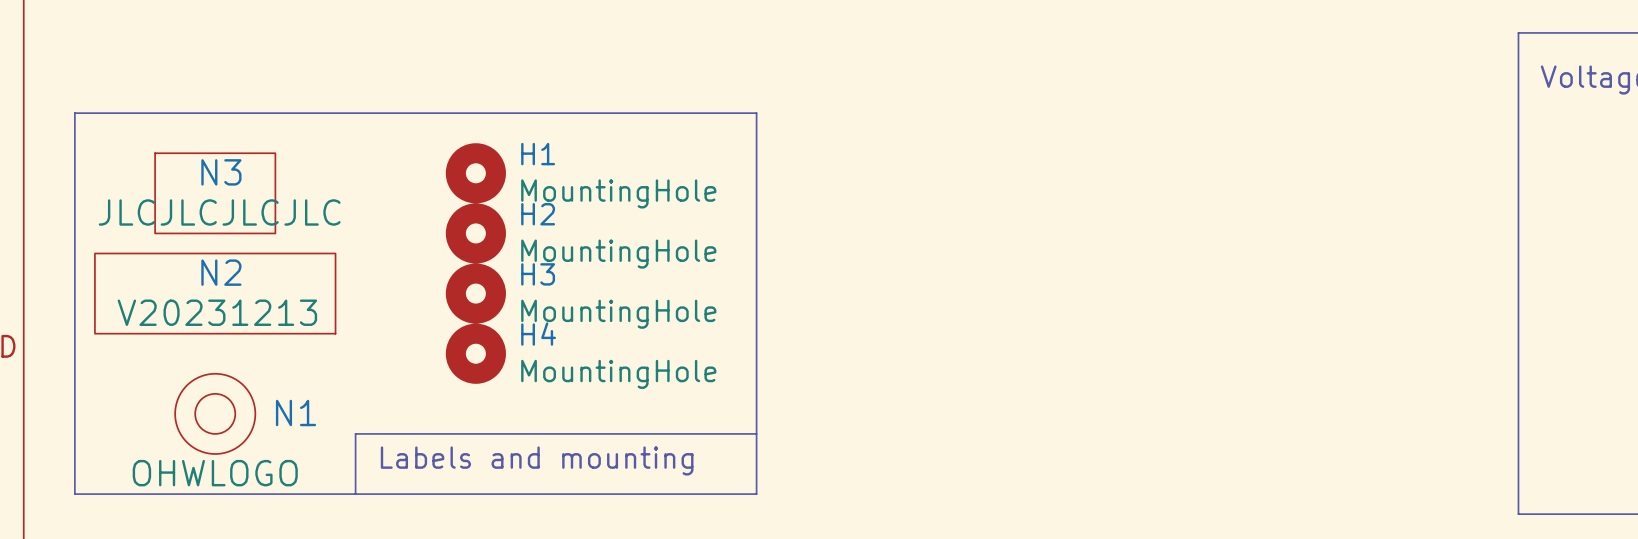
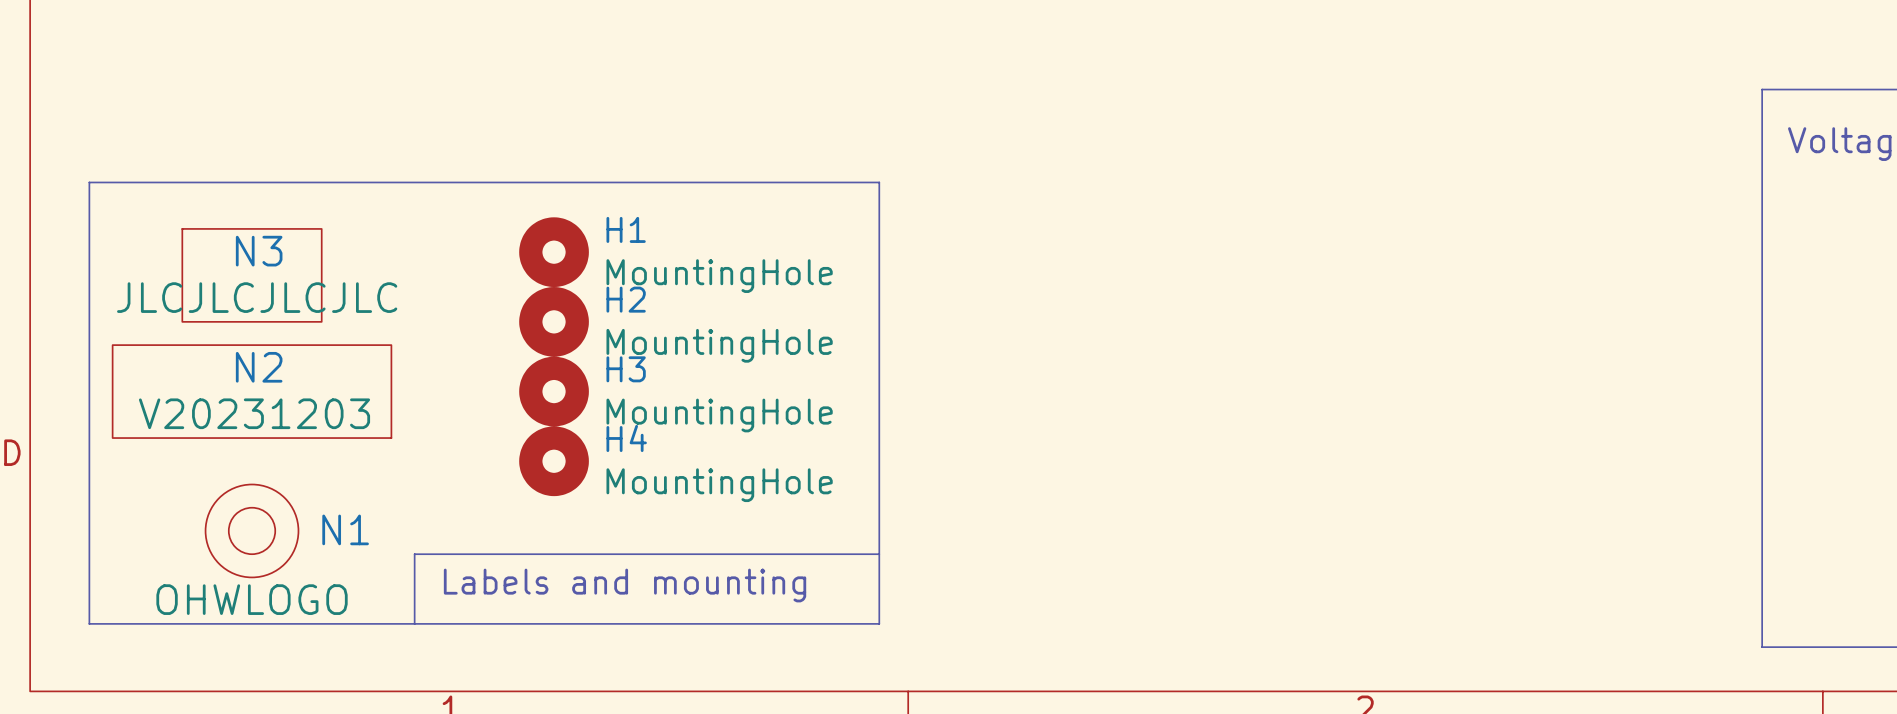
N2 value: V20231213 (217, 312) -> V20231203 (254, 413)

